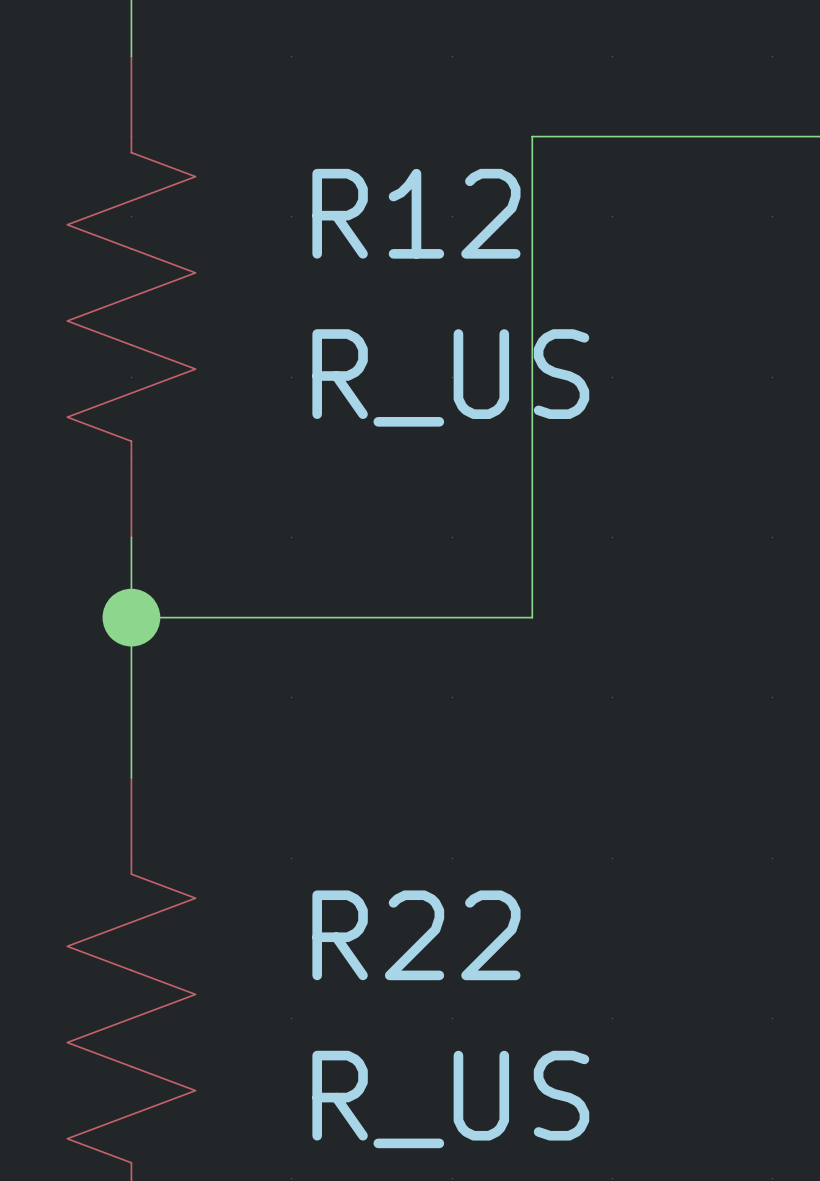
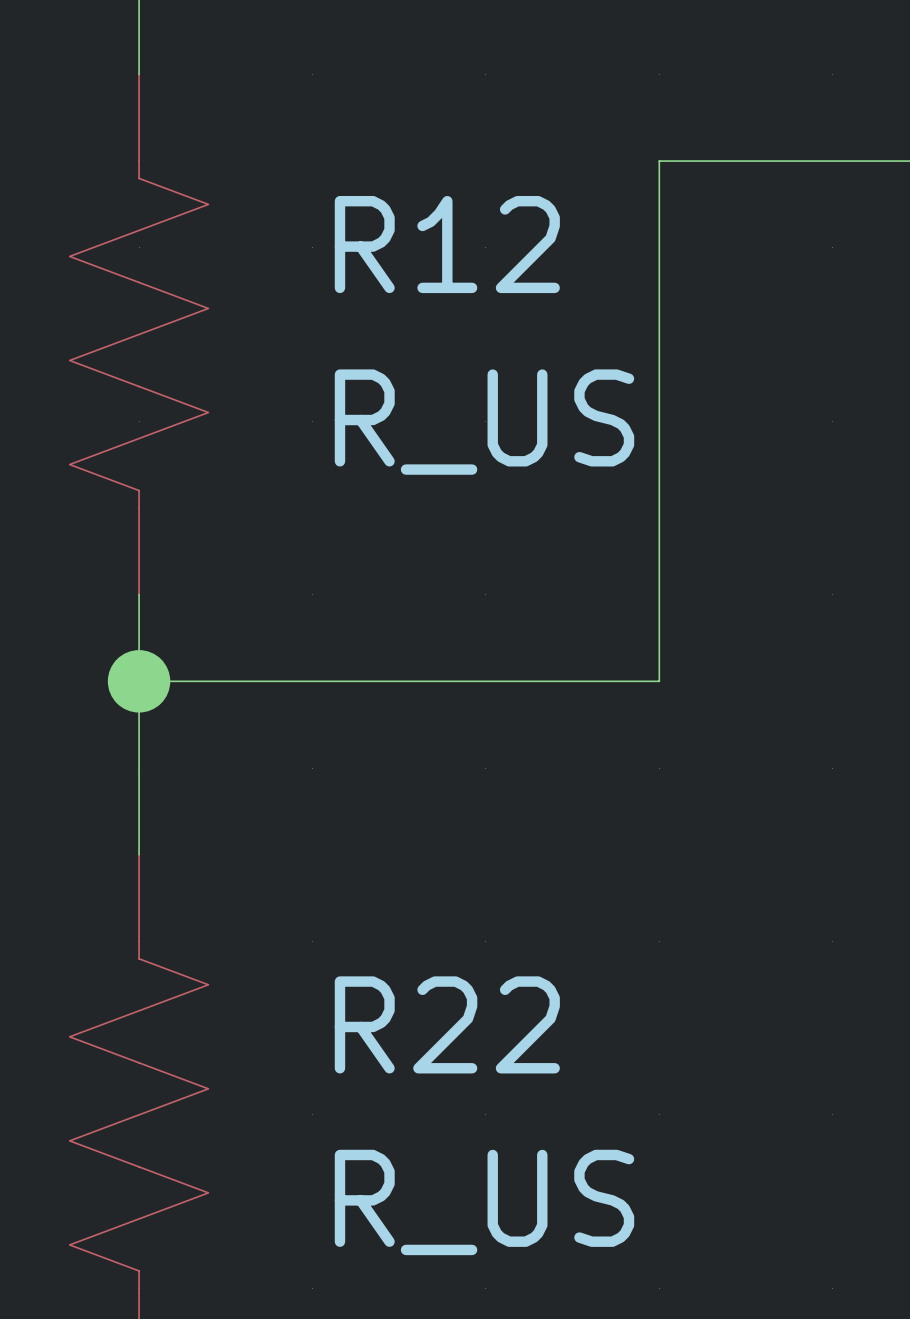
wire: (612, 136) (532, 136) (532, 617) -> (659, 161) (659, 681) (572, 681)

